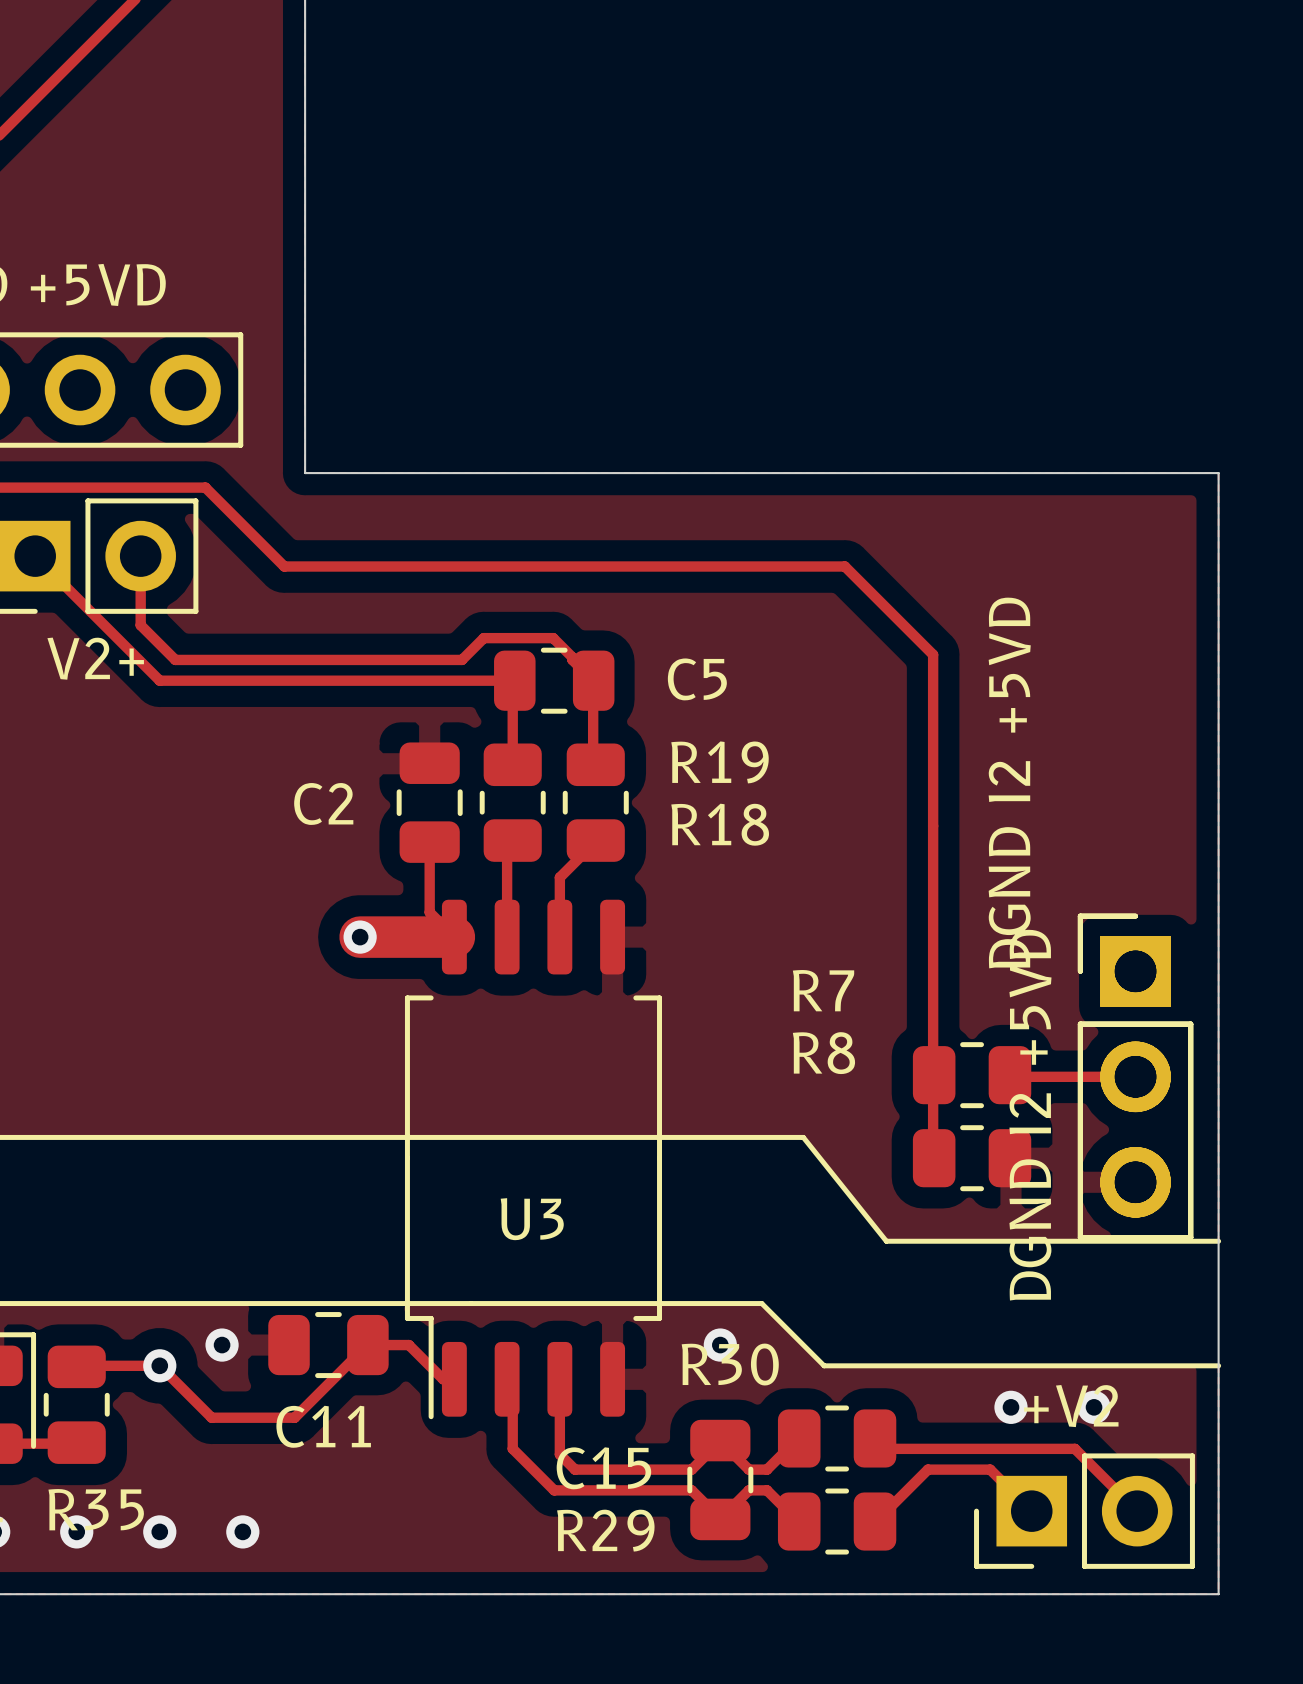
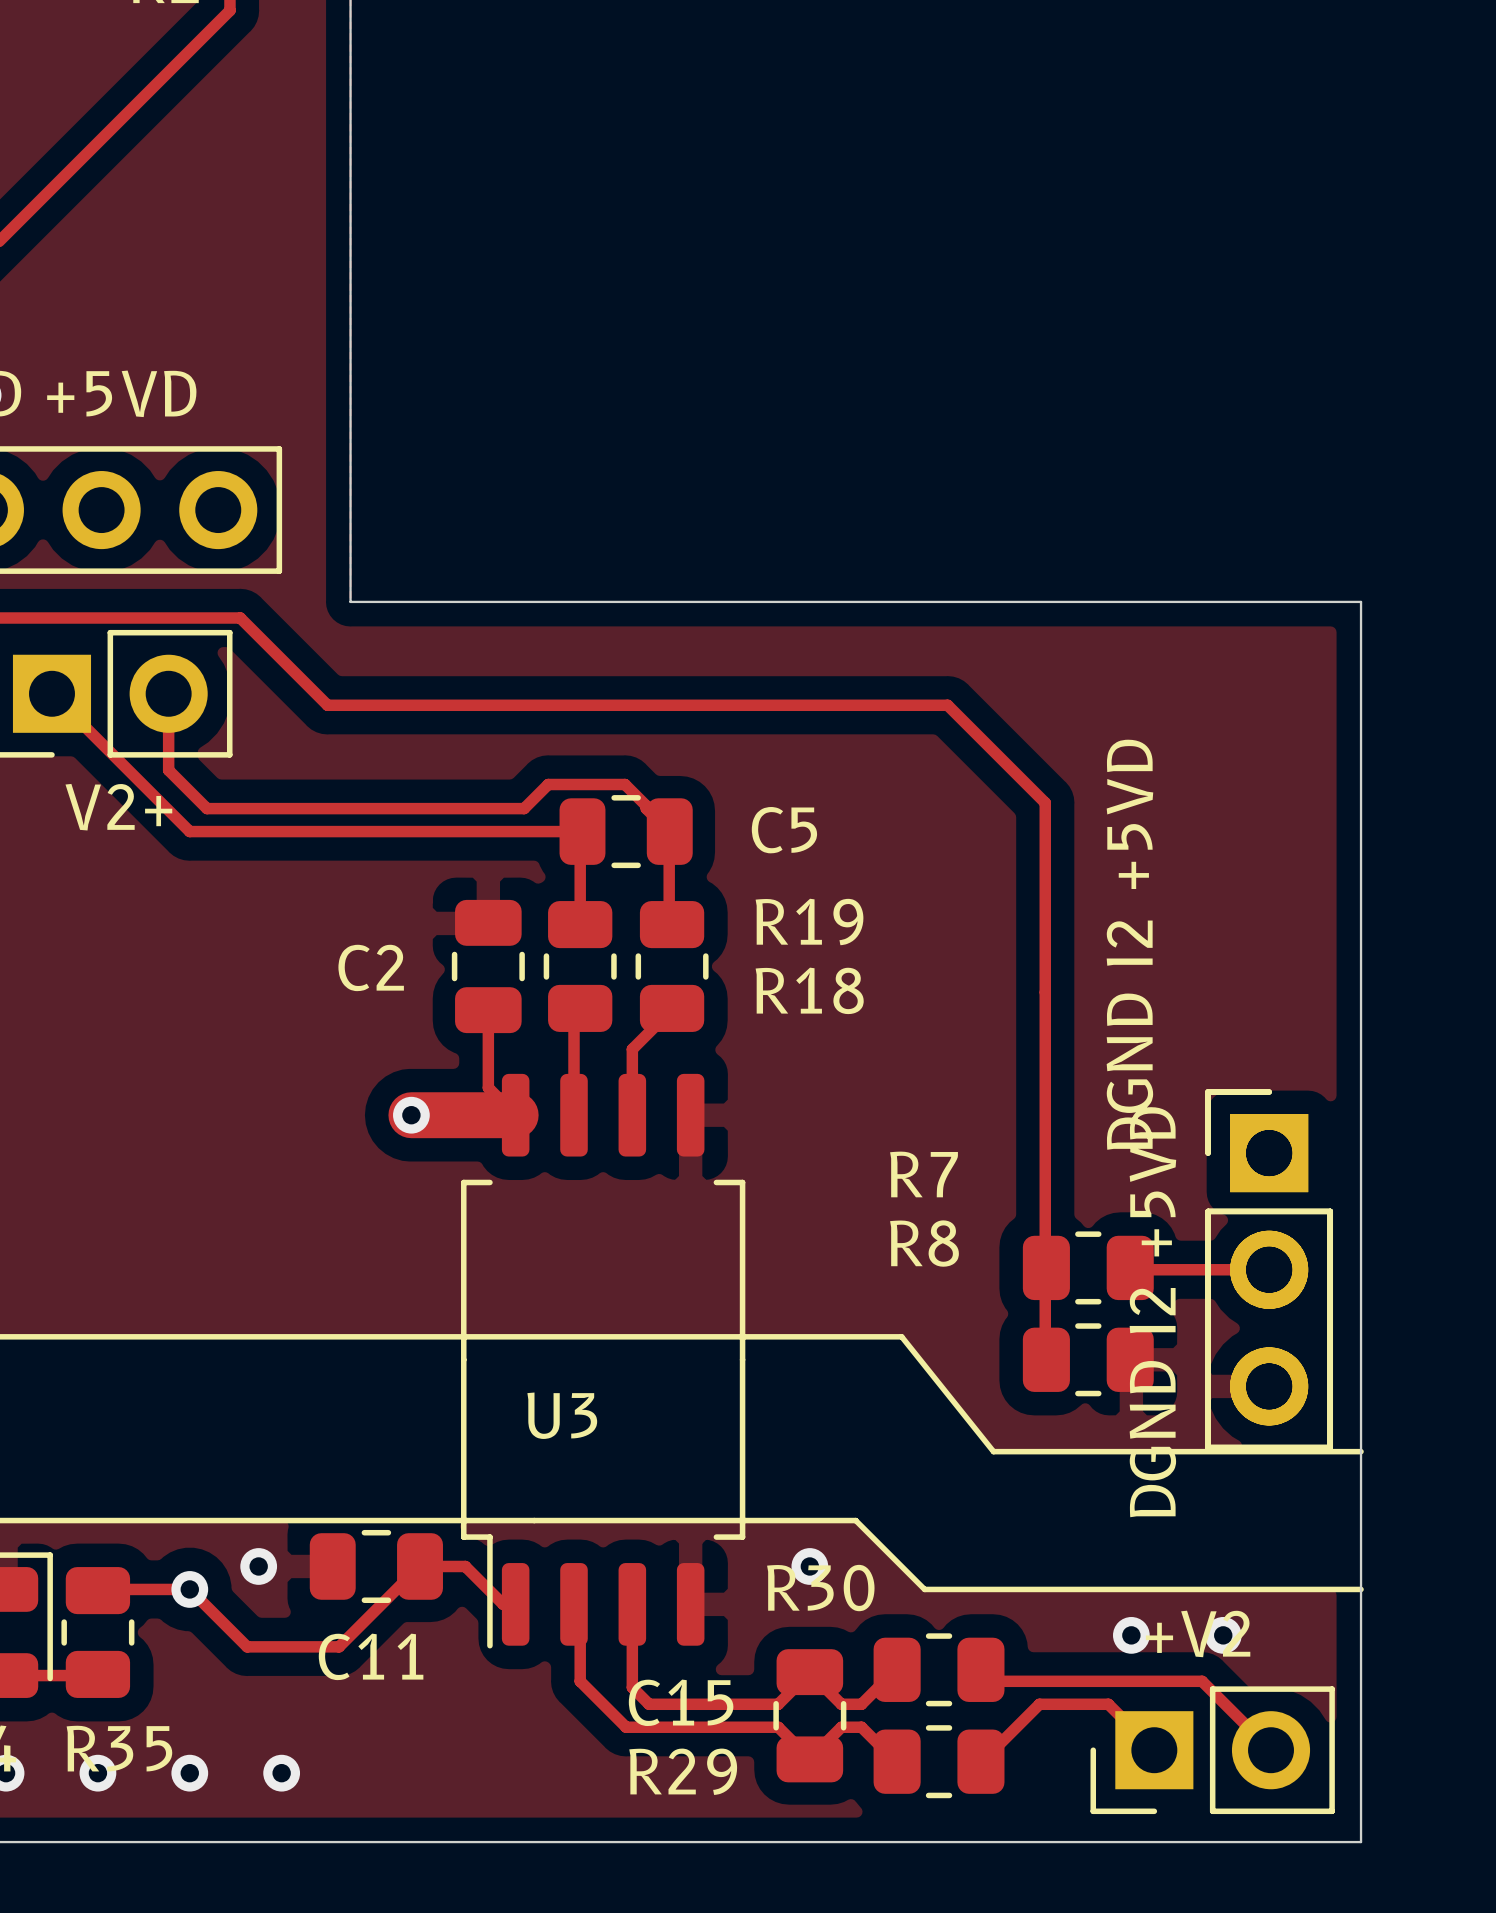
U3 name position: U3 (532, 1219) -> U3 (562, 1415)

